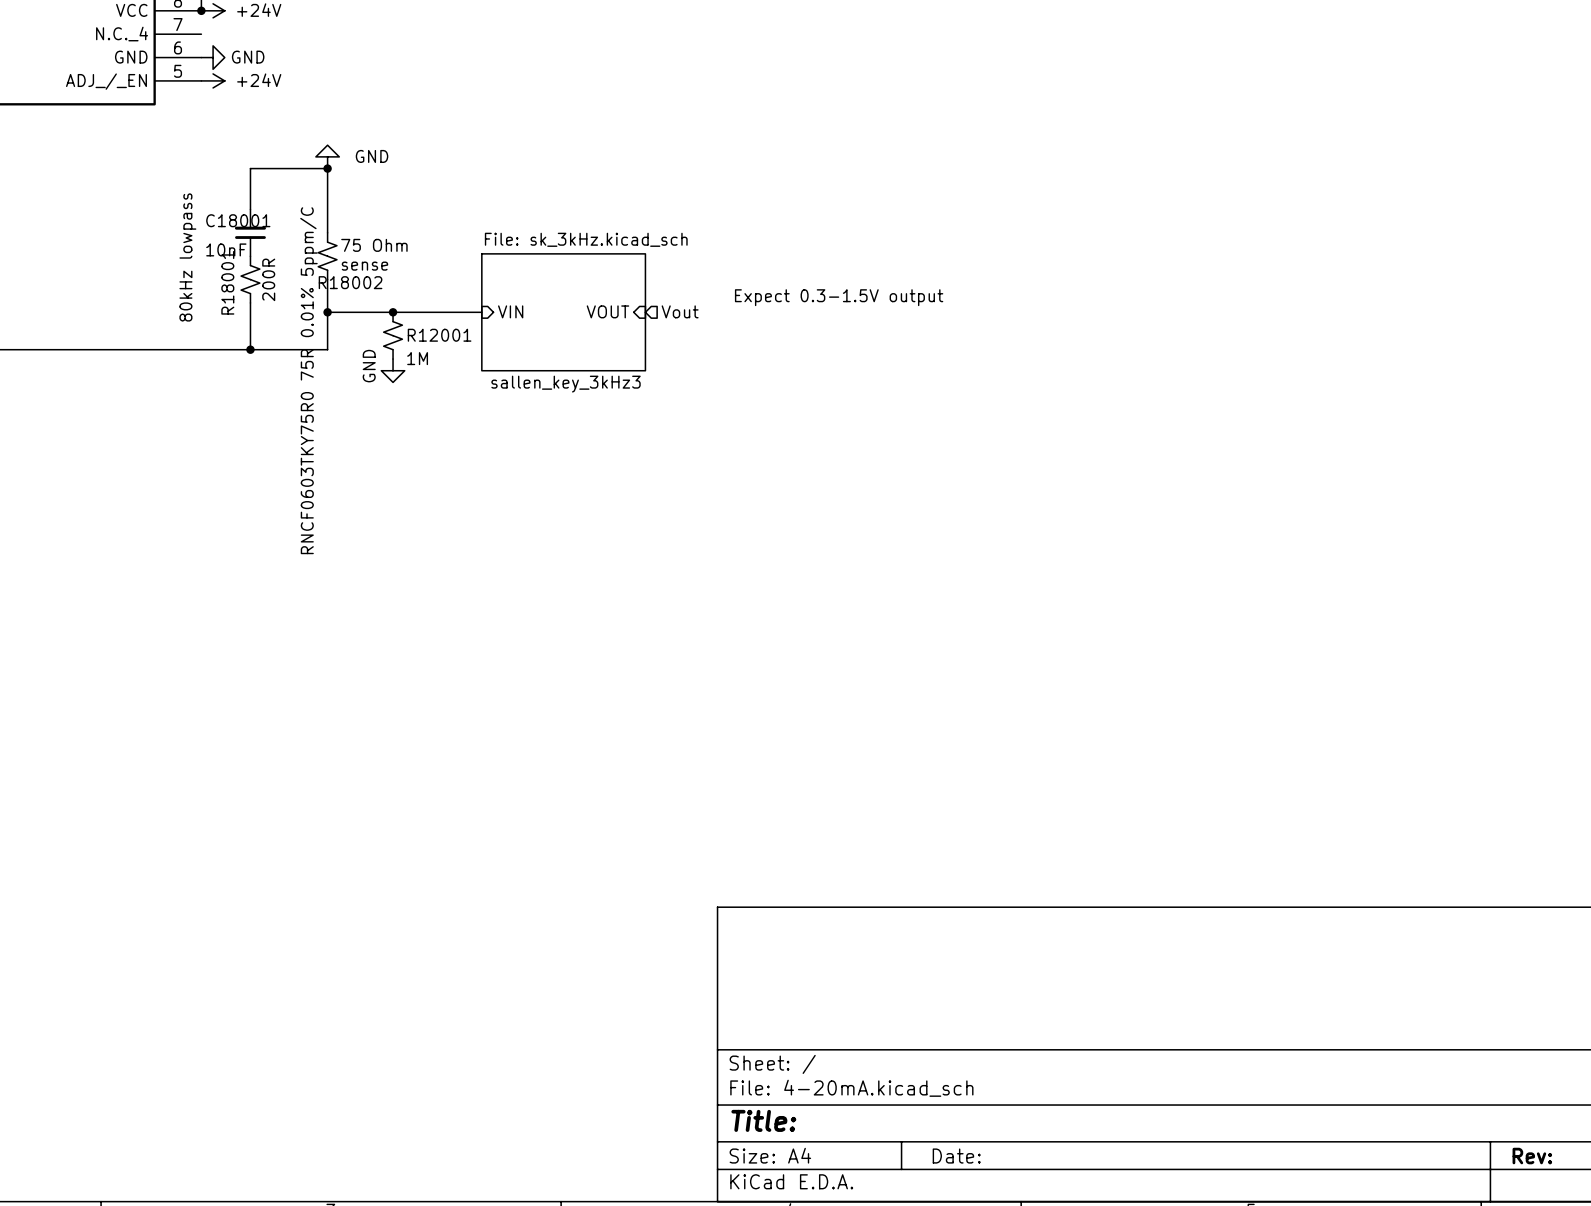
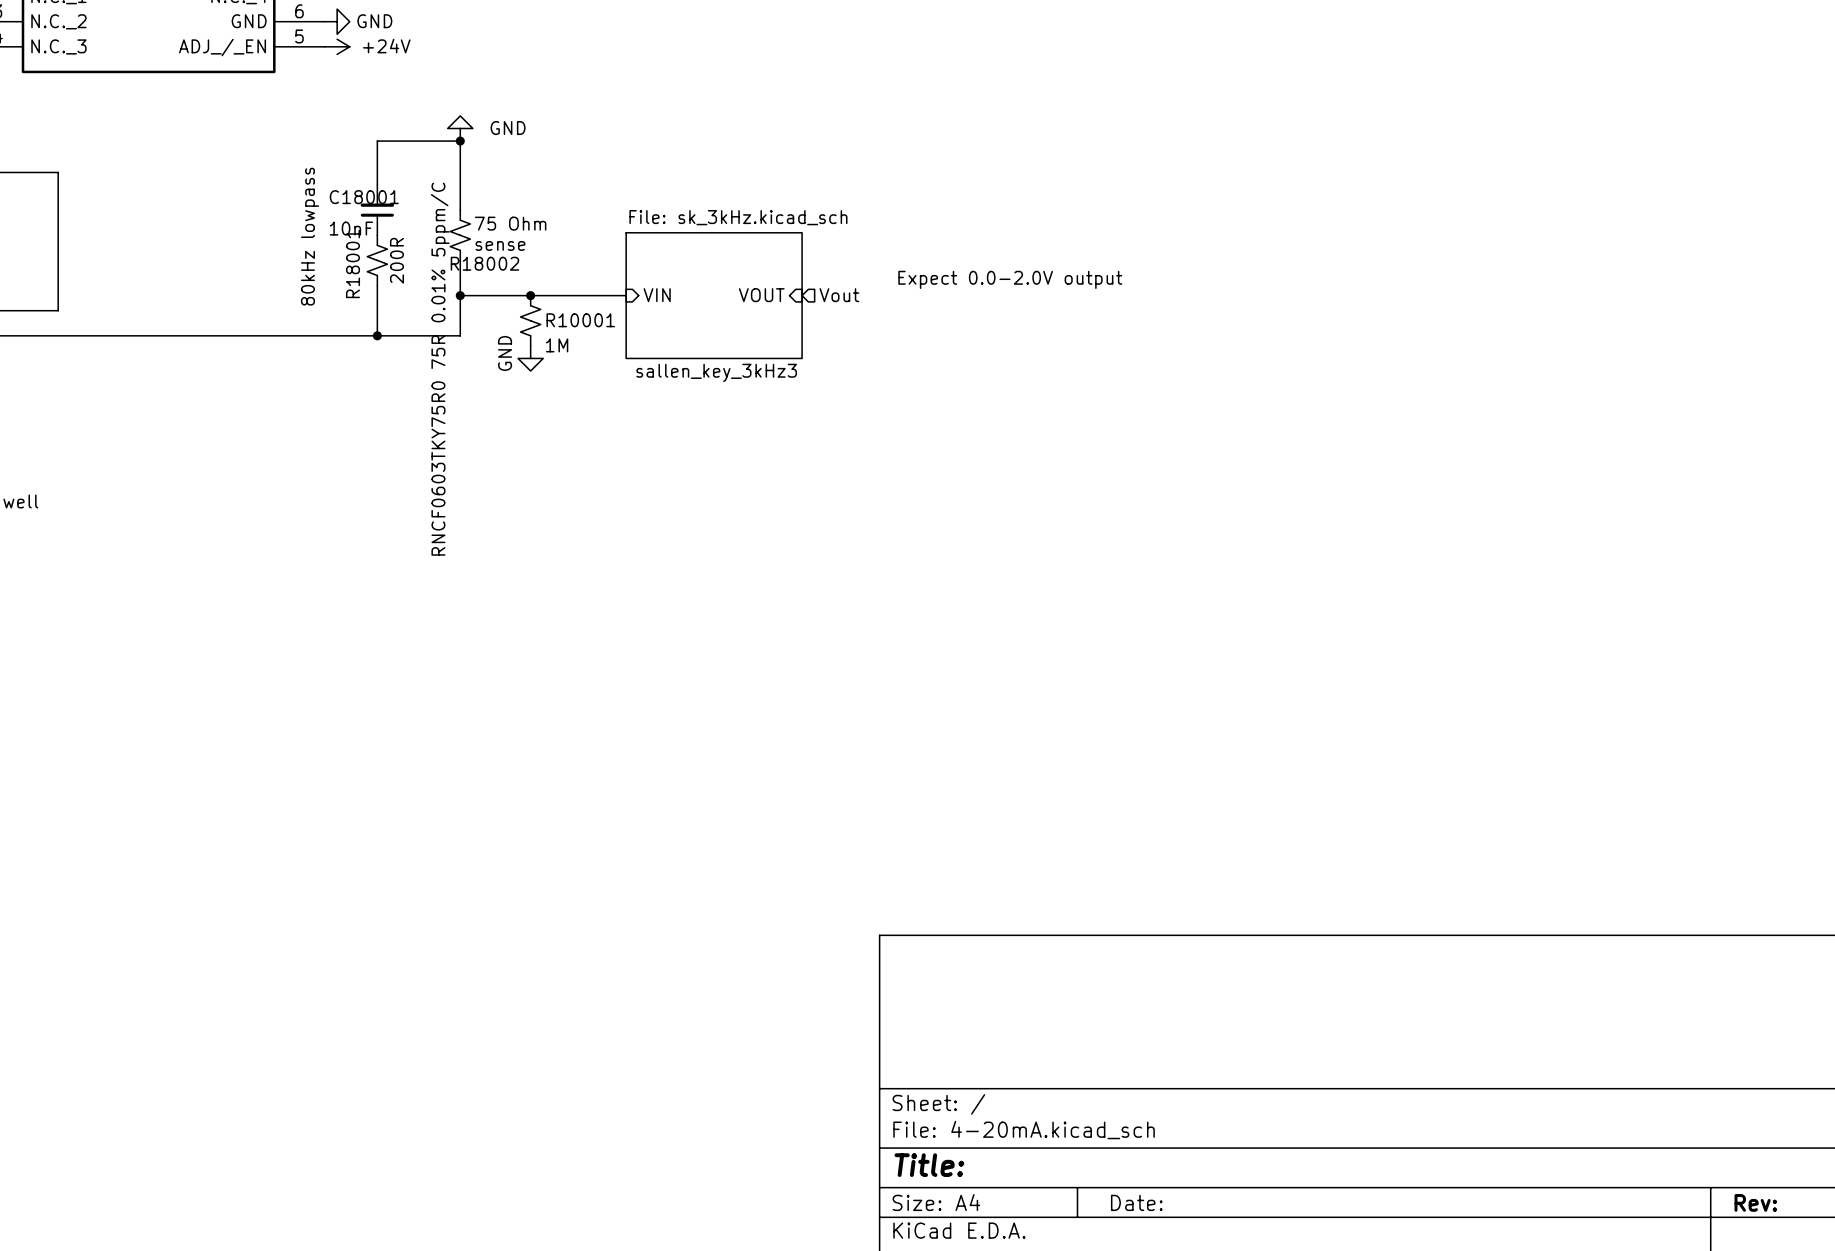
text: Expect 0.3-1.5V output (839, 297) -> Expect 0.0-2.0V output (1010, 279)
R12001 name: R12001 (439, 335) -> R10001 (580, 320)

